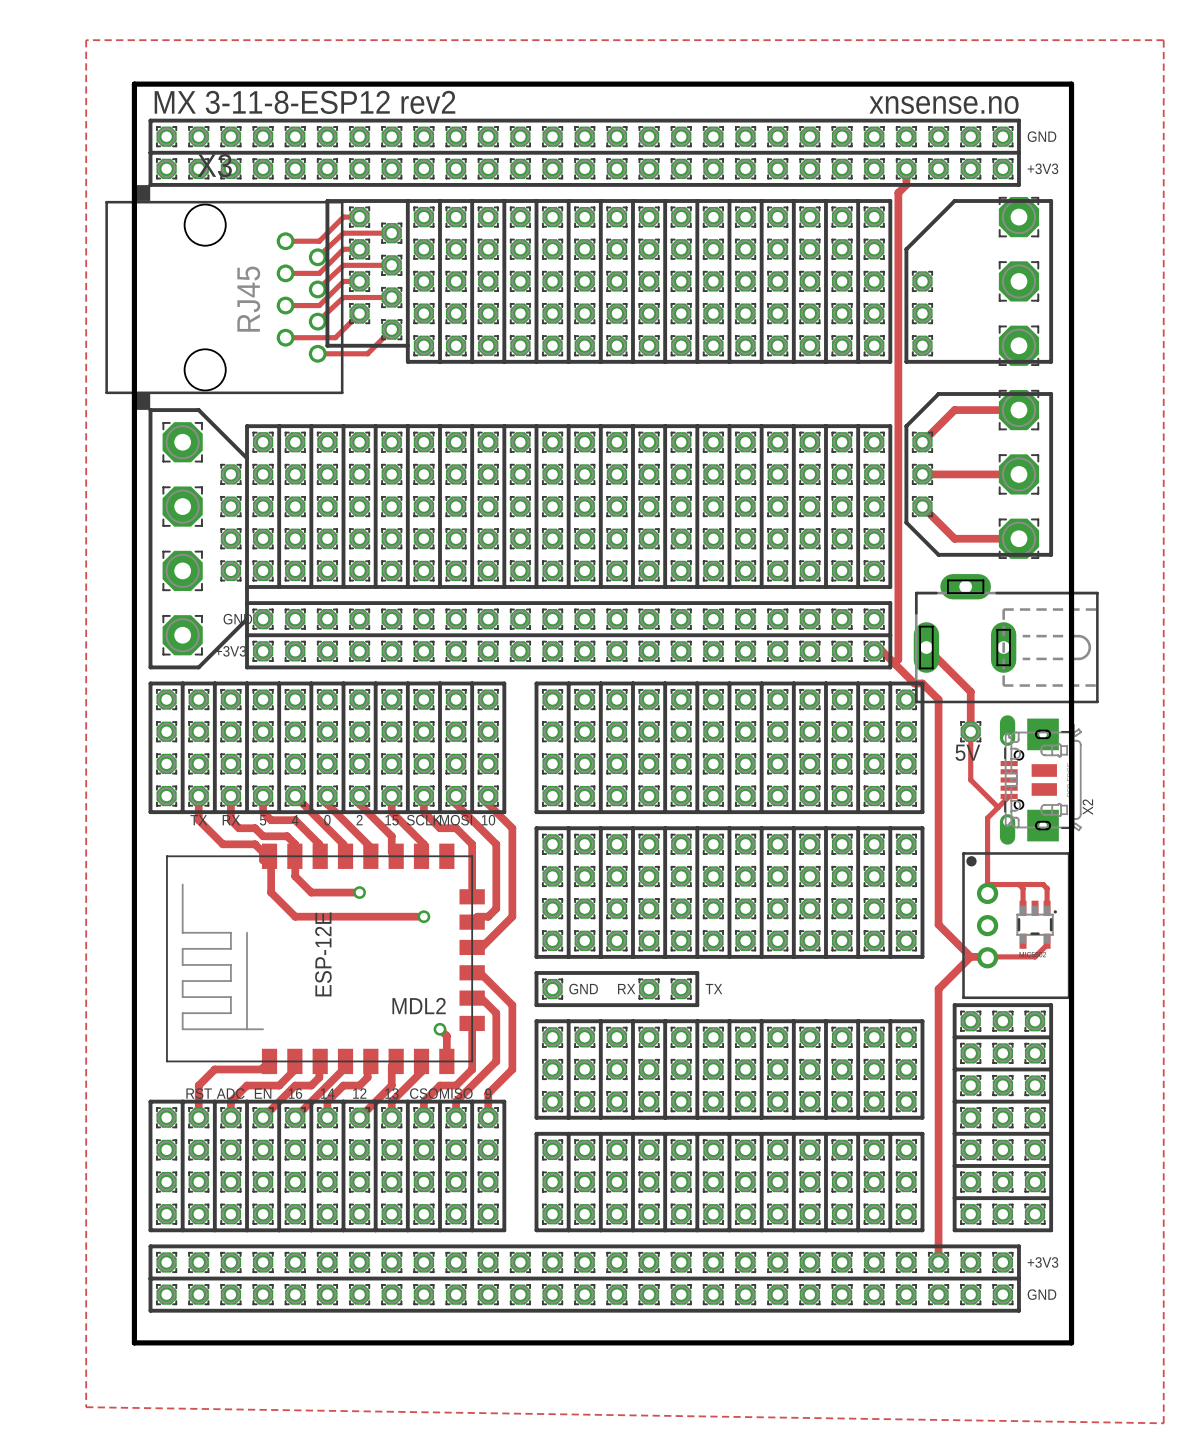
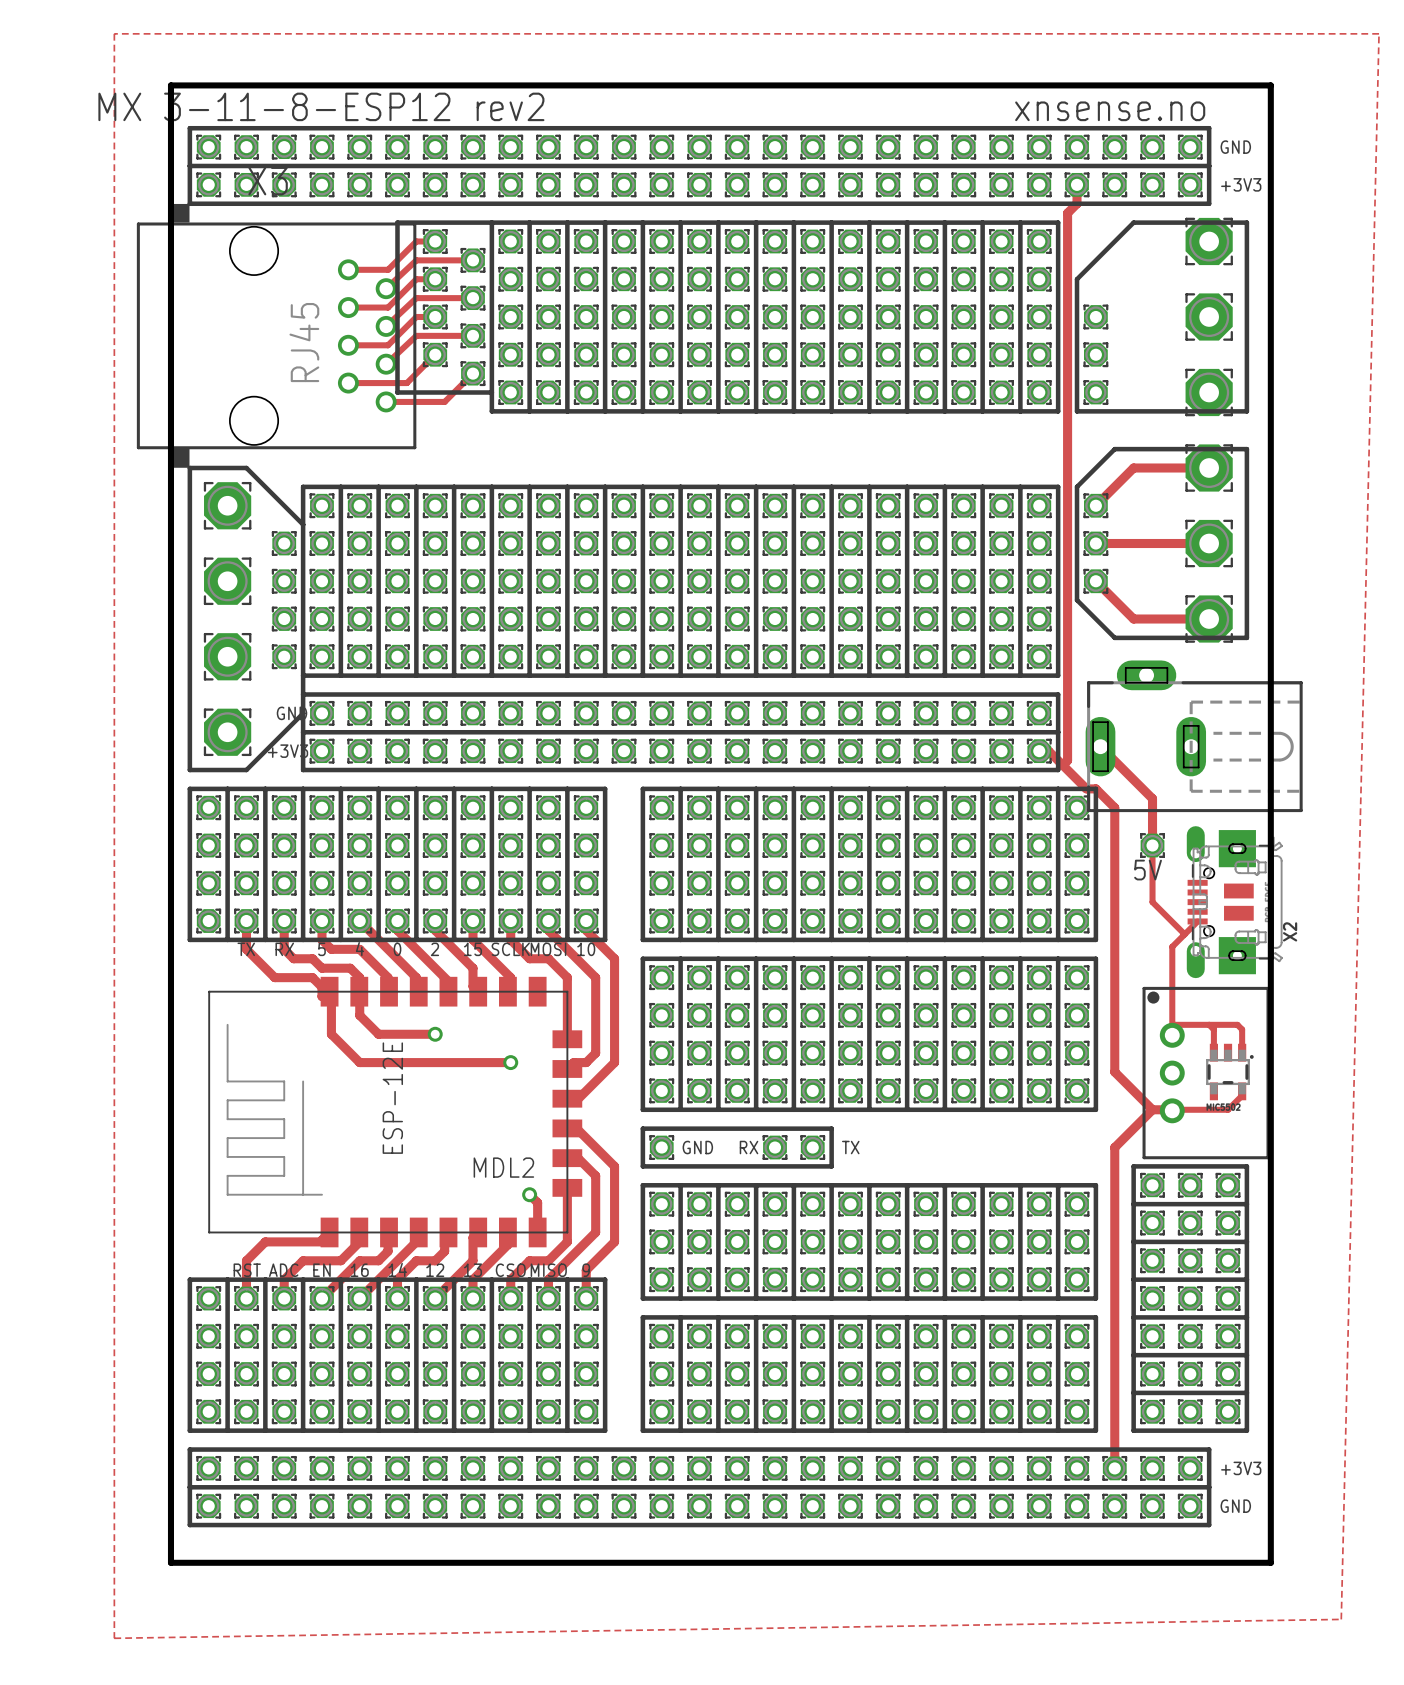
zone outline: (1163, 40) (1163, 1423) (86, 1407) -> (1379, 33) (1341, 1619) (114, 1638)

